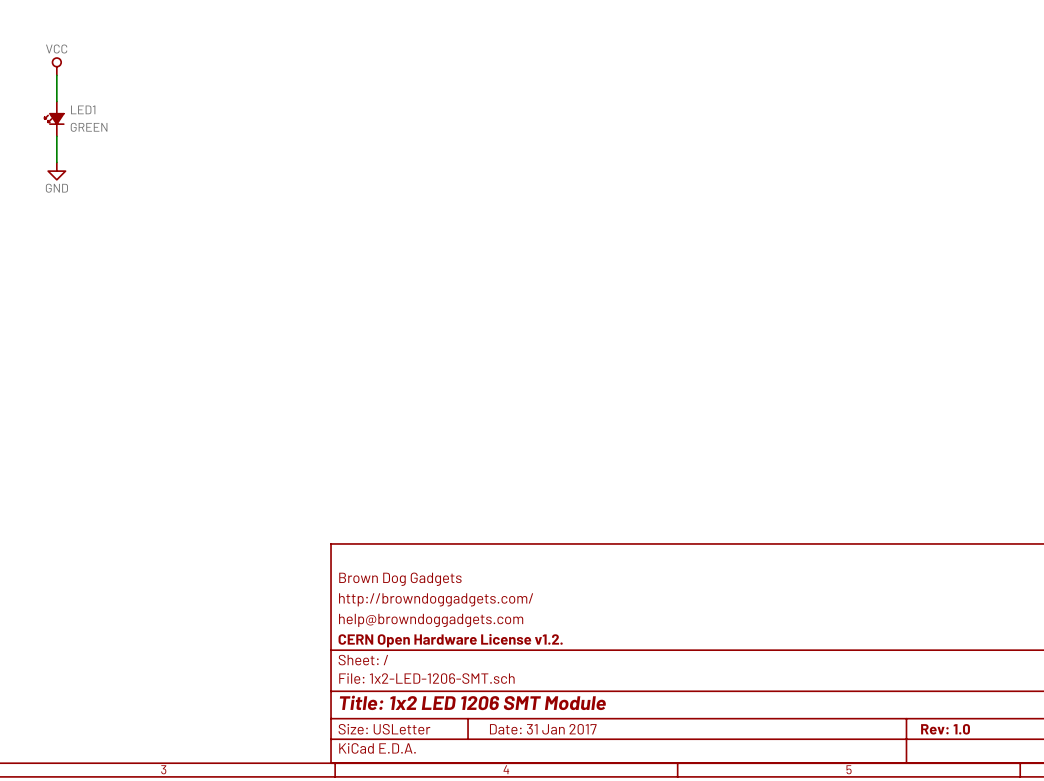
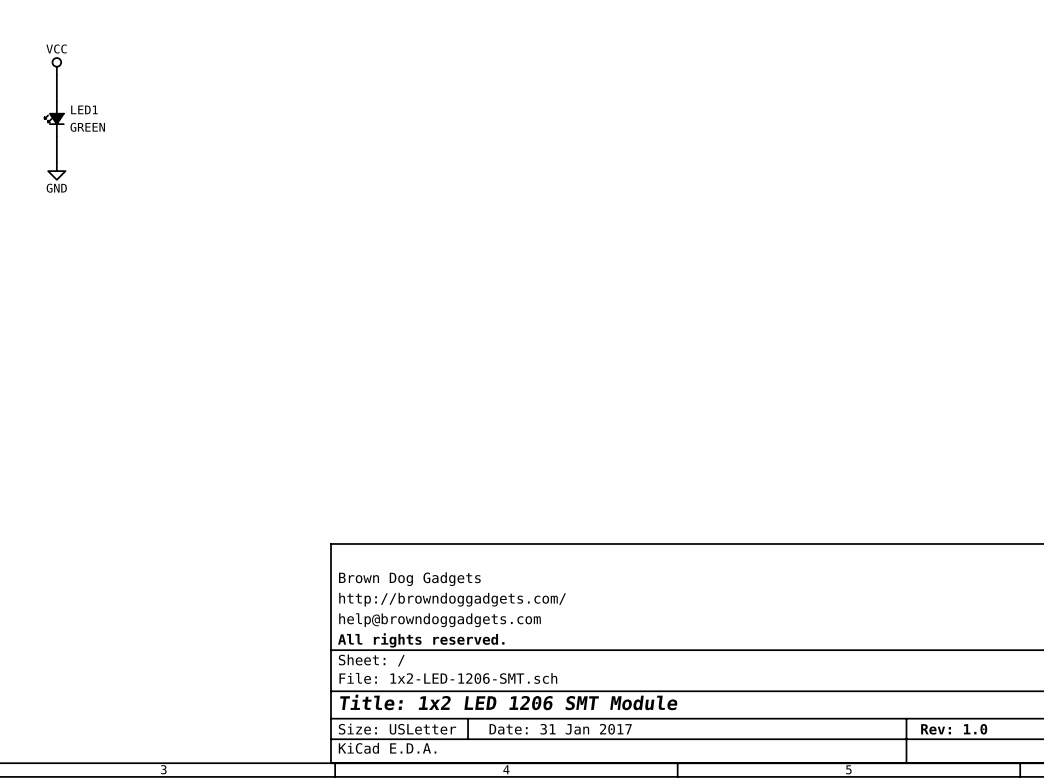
title block: CERN Open Hardware License v1.2. (450, 640) -> All rights reserved. (421, 640)

